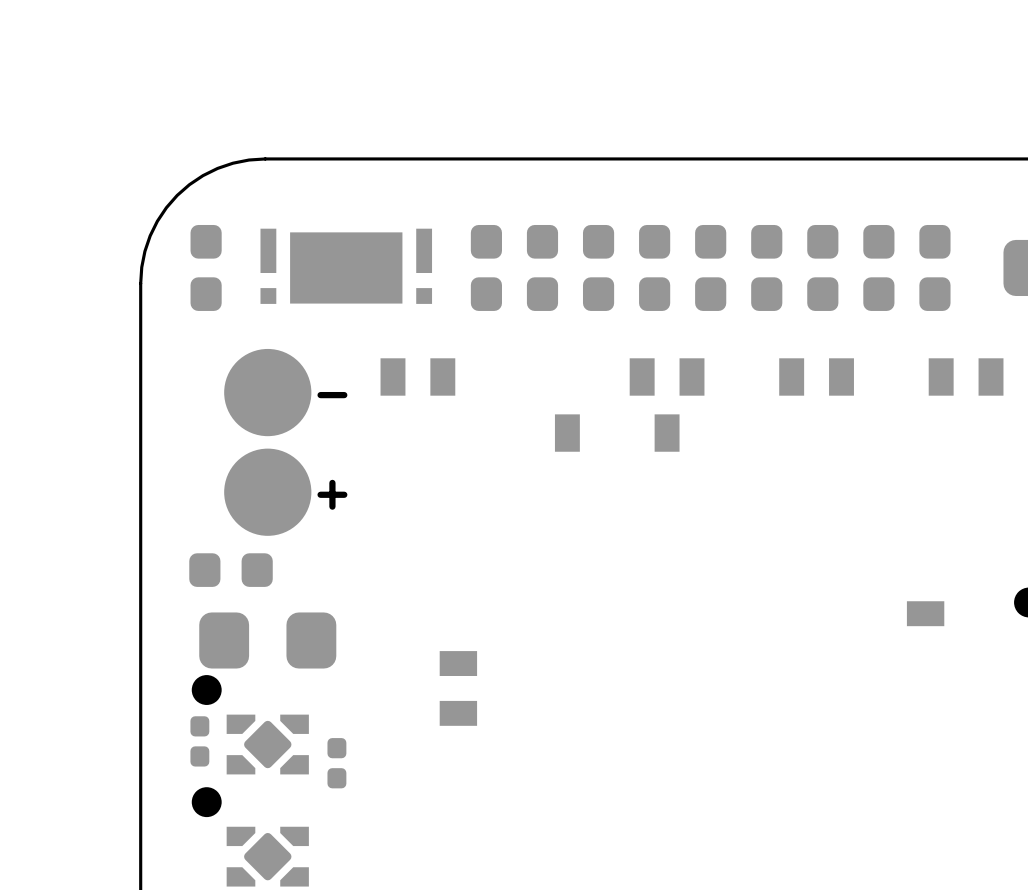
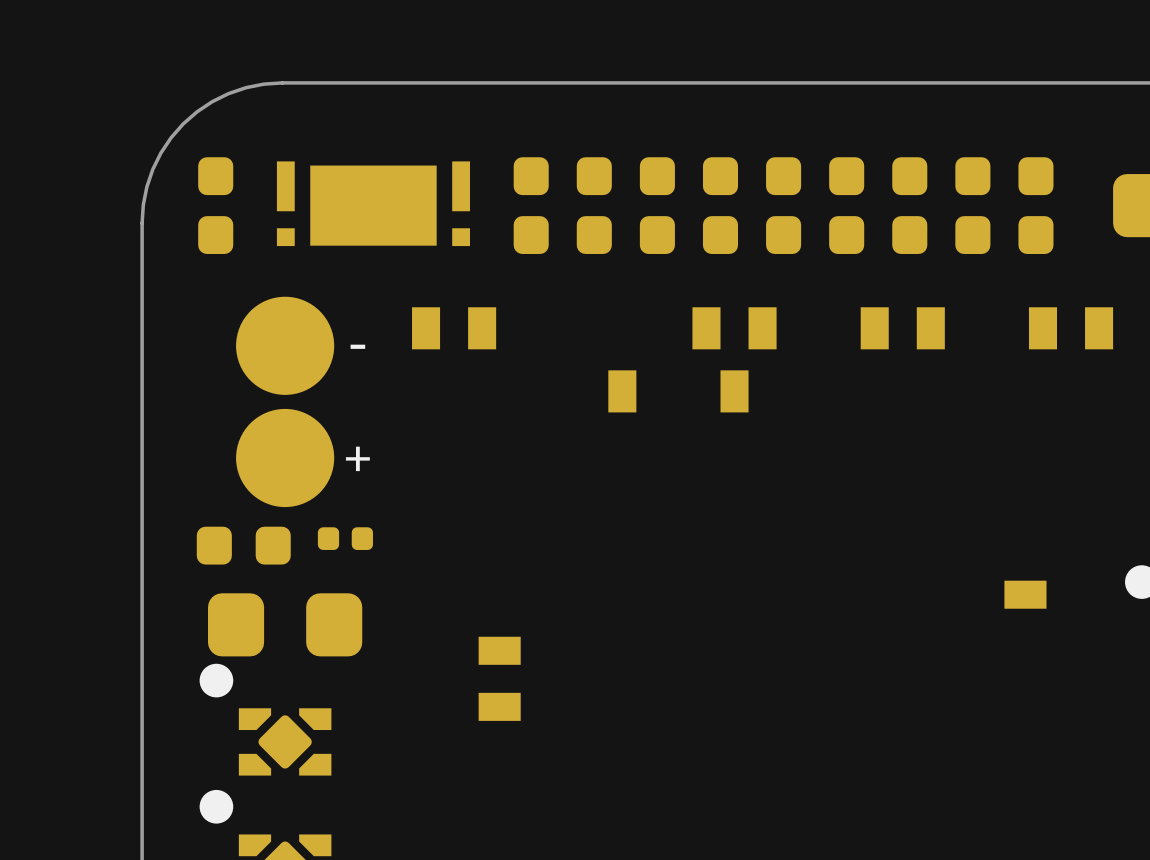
part: none -> (345, 538)
part: (199, 741) -> none
part: (336, 763) -> none

